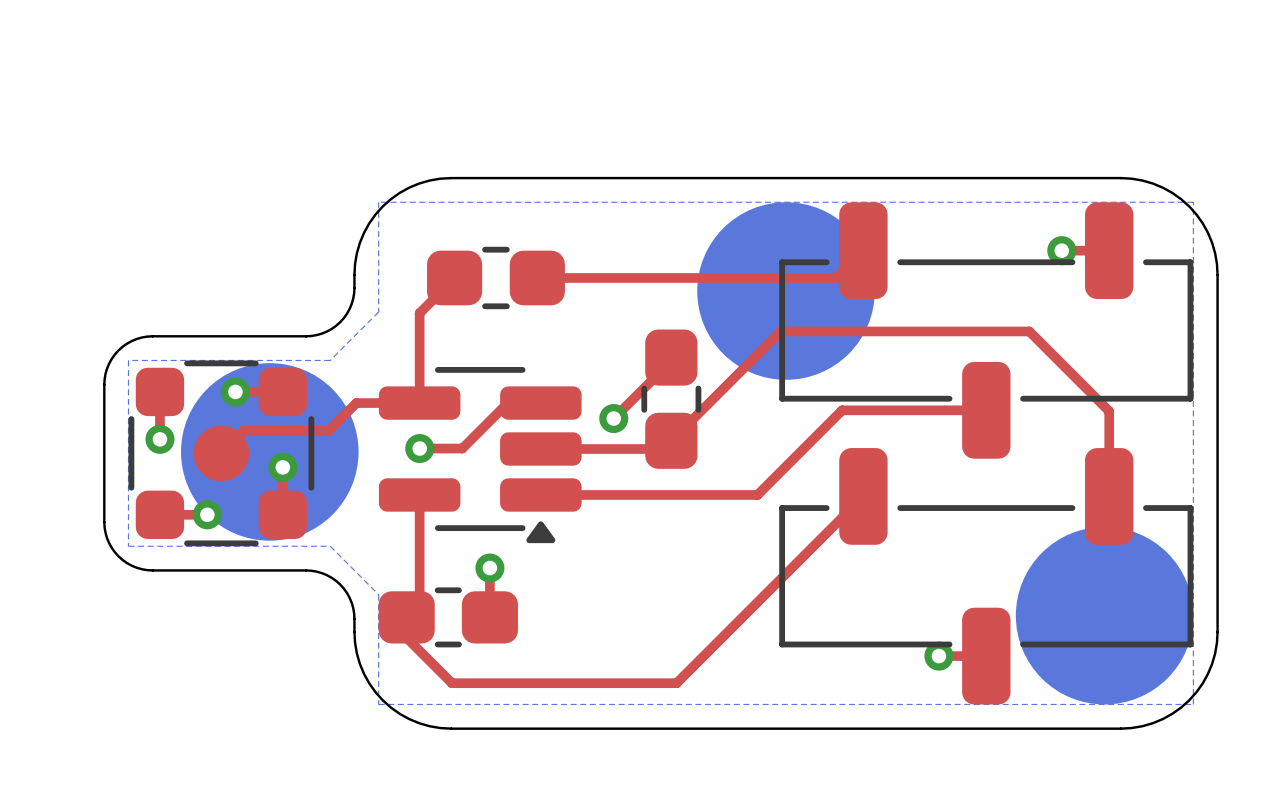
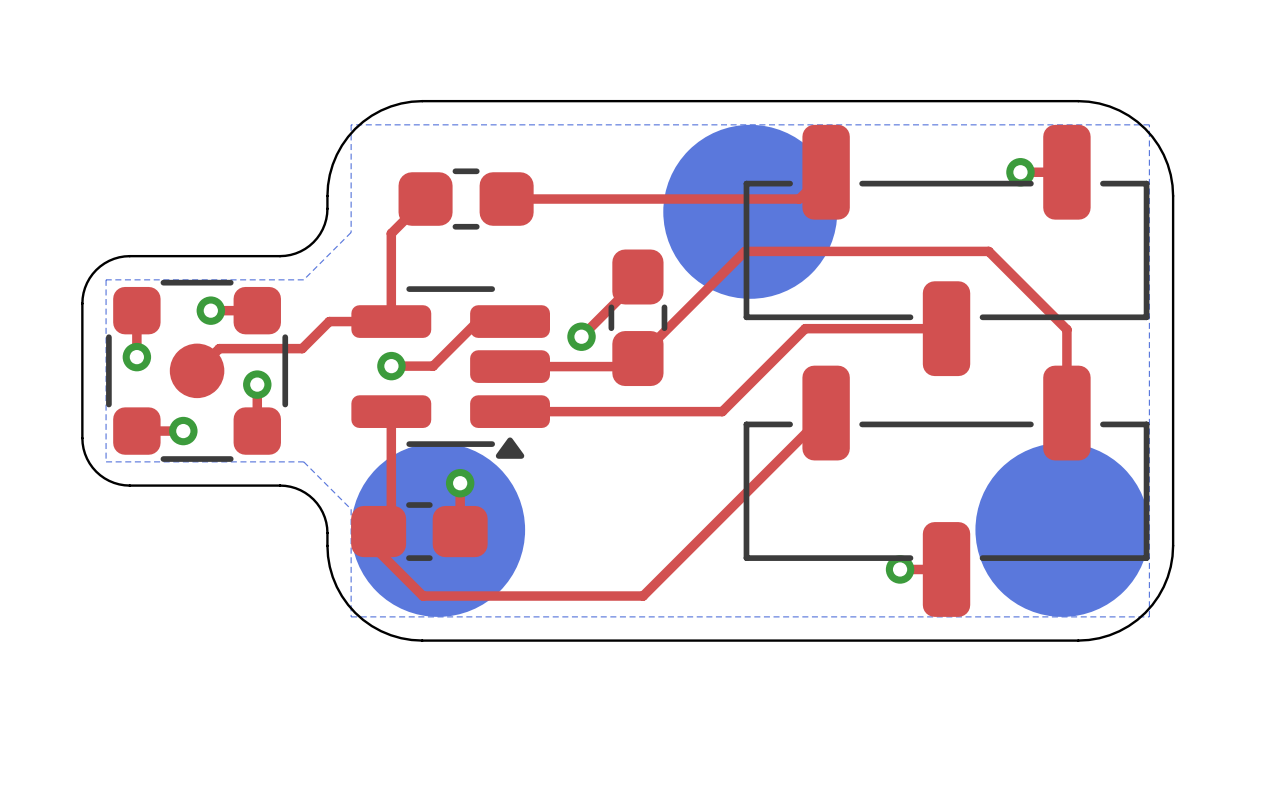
part position: (269, 451) -> (438, 529)

